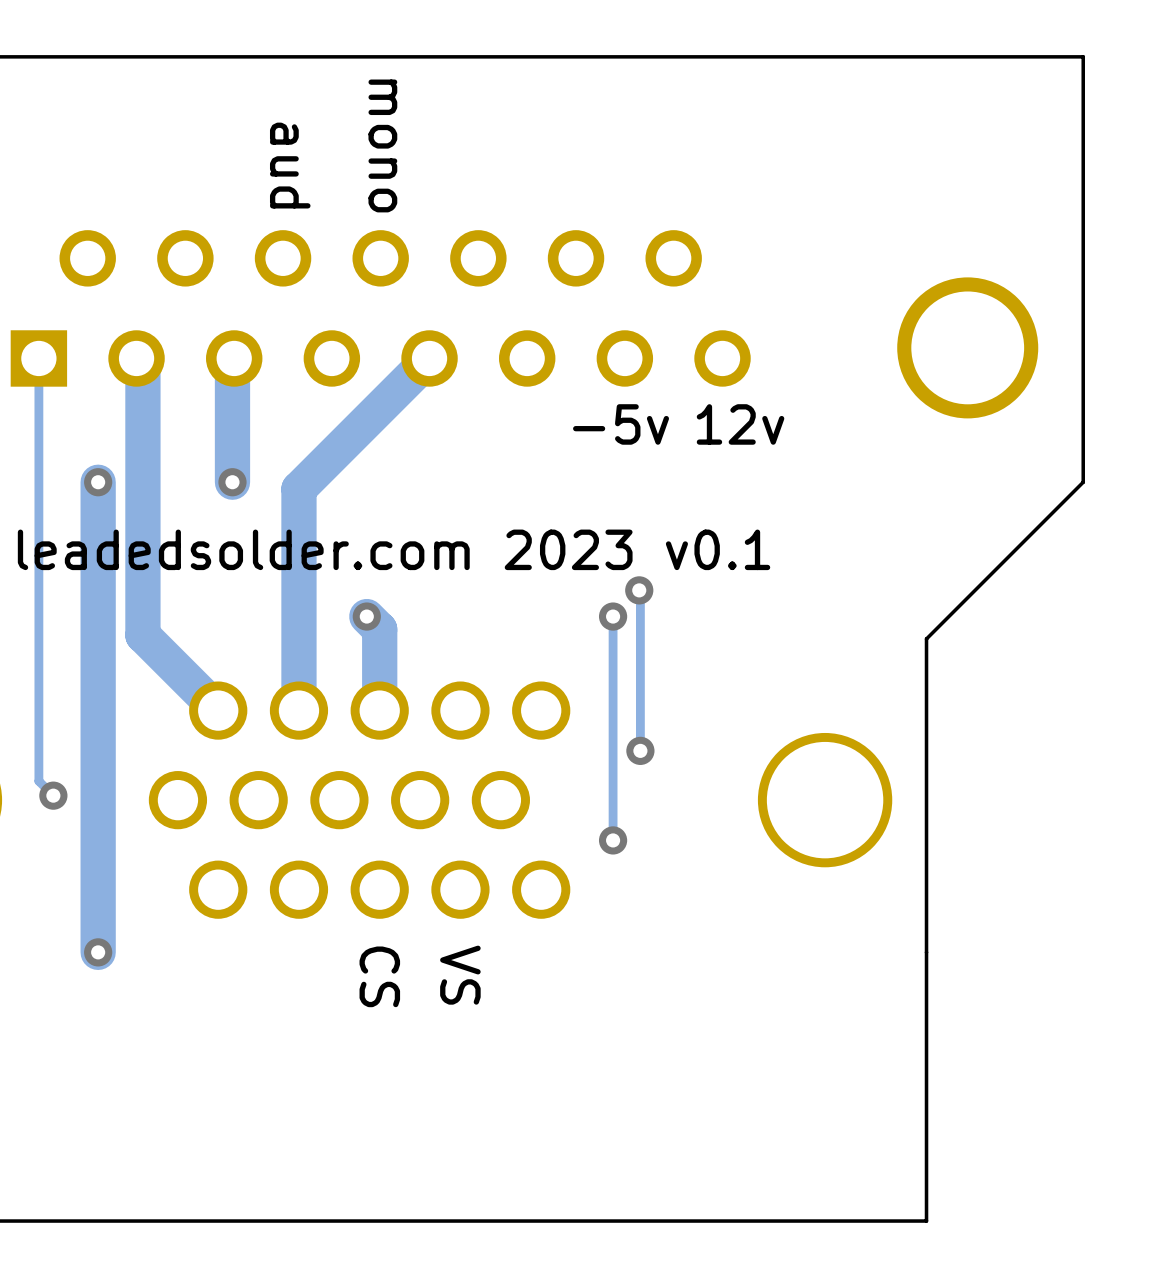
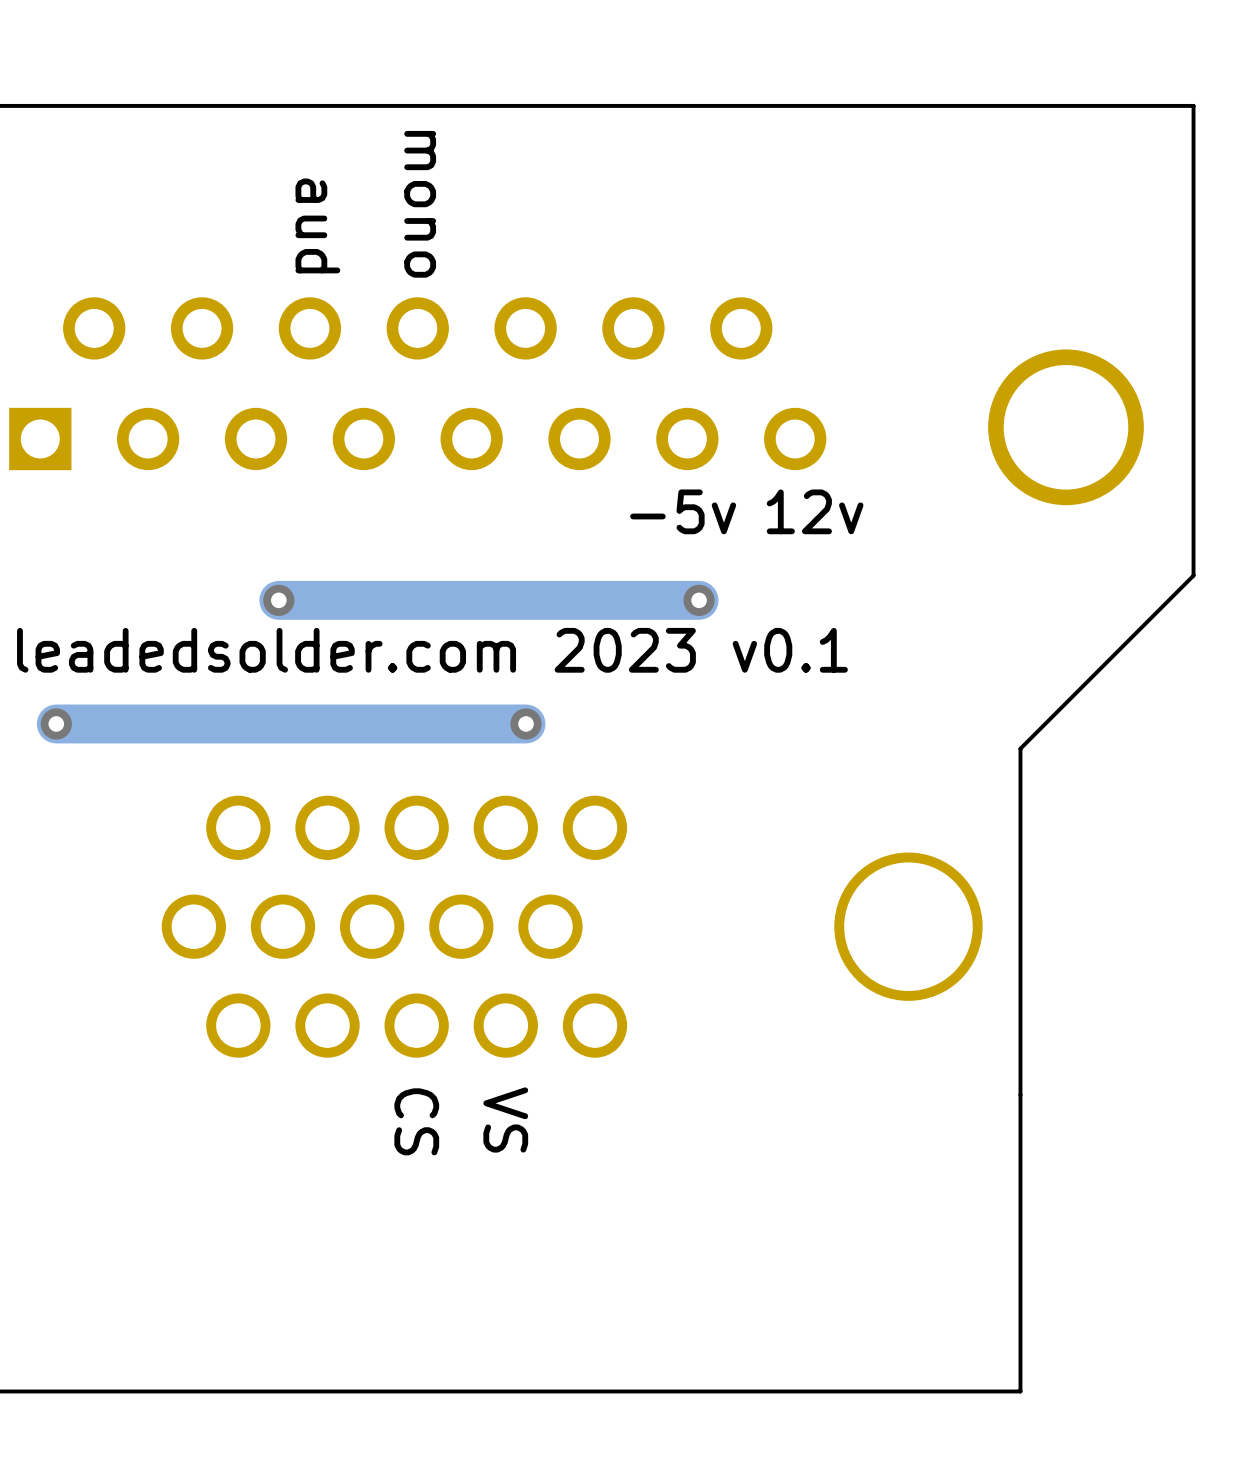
track: (38, 358) (38, 781) (53, 795) -> none
track: (136, 358) (142, 364) (142, 635) (218, 710) -> none
track: (234, 358) (232, 360) (232, 482) -> none
track: (429, 358) (298, 489) (298, 710) -> none
track: (98, 482) (98, 952) -> none
via: (98, 482) -> none
via position: (232, 482) -> (278, 600)
track: none -> (699, 600) (278, 600)
via: none -> (699, 600)
track: (639, 590) (635, 594) (640, 599) (640, 750) -> none
via: (639, 590) -> none
via: none -> (56, 723)
track: (366, 616) (379, 629) (379, 710) -> none
via: (366, 616) -> none
track: none -> (526, 723) (56, 723)
via: none -> (526, 723)
track: (613, 616) (613, 840) -> none
via: (613, 616) -> none
via: (640, 750) -> none
via: (53, 795) -> none
via: (613, 840) -> none
via: (98, 952) -> none

